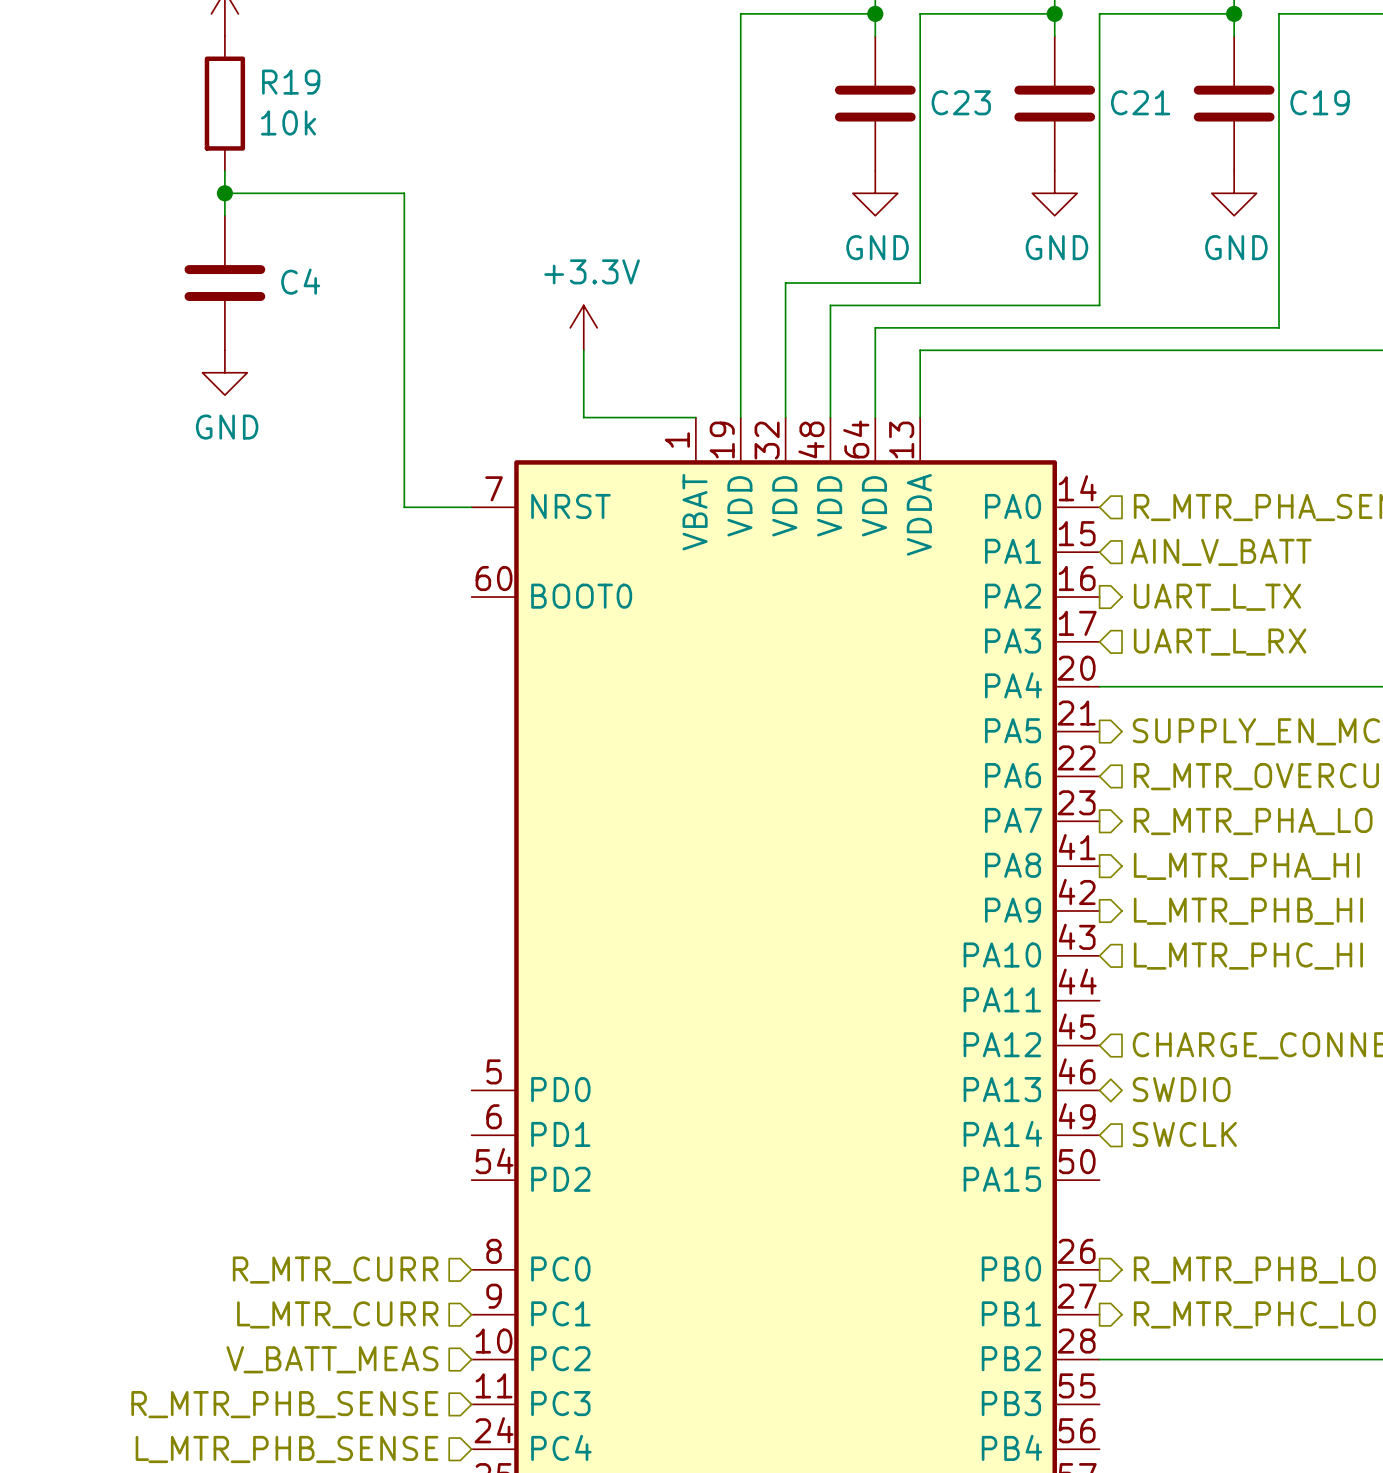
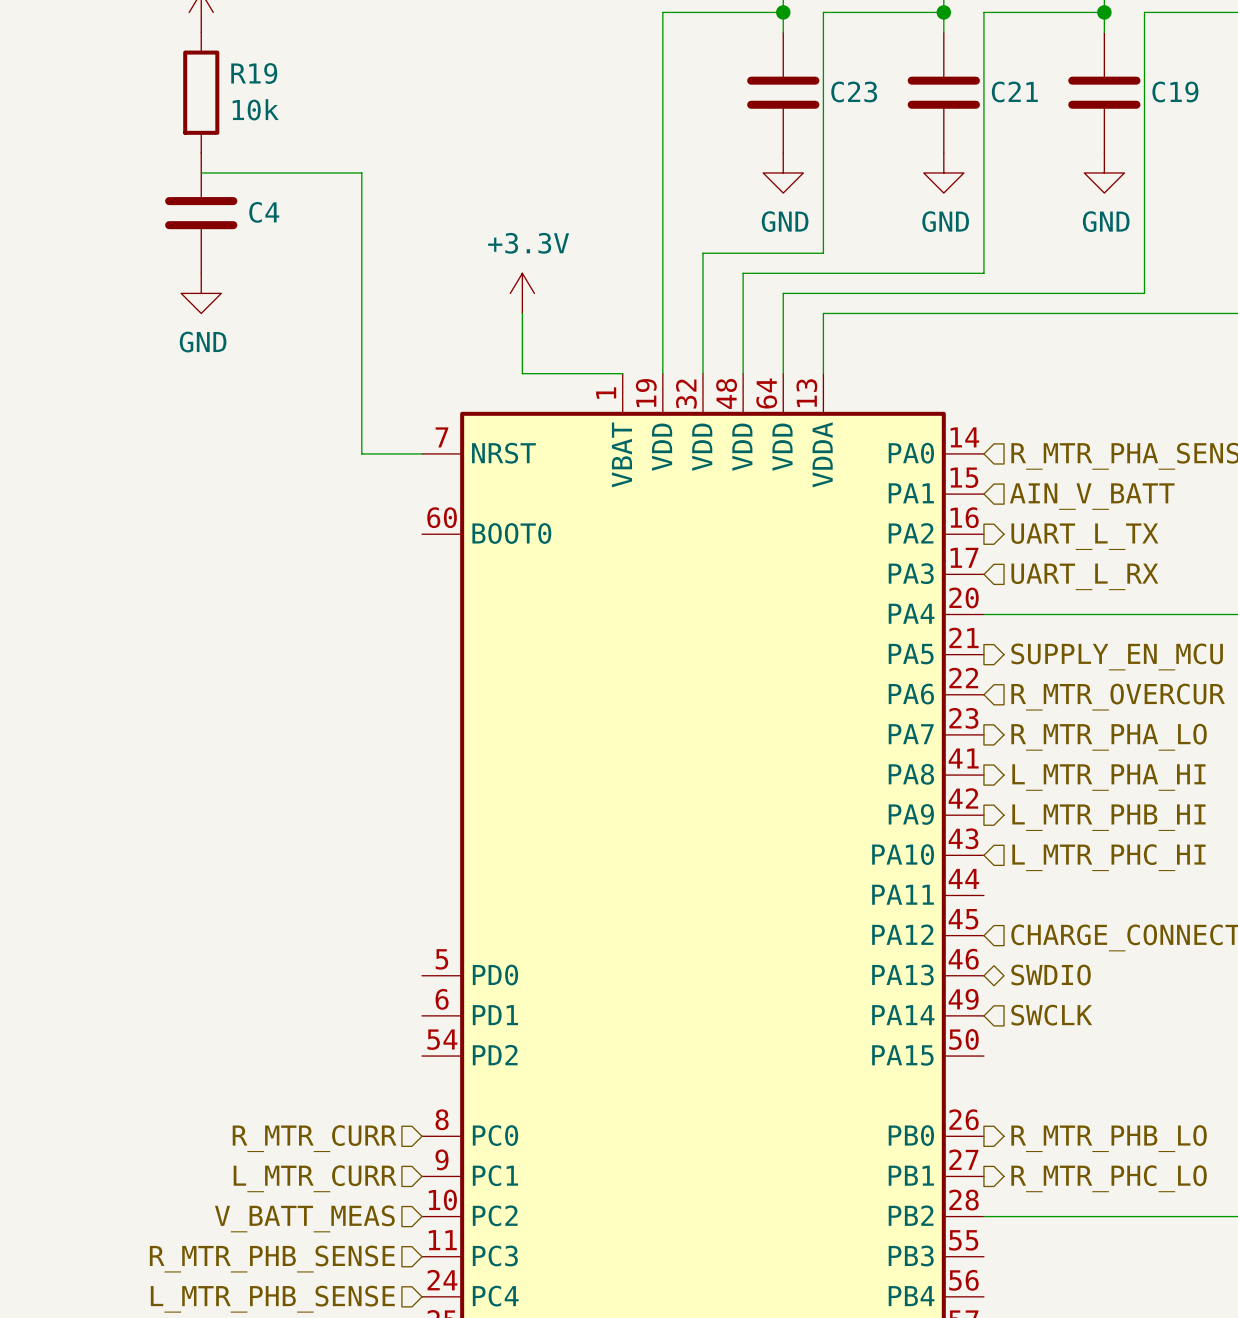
junction: (224, 193) -> none
C4 position: (224, 283) -> (201, 213)
power symbol position: GND (224, 372) -> GND (201, 293)

